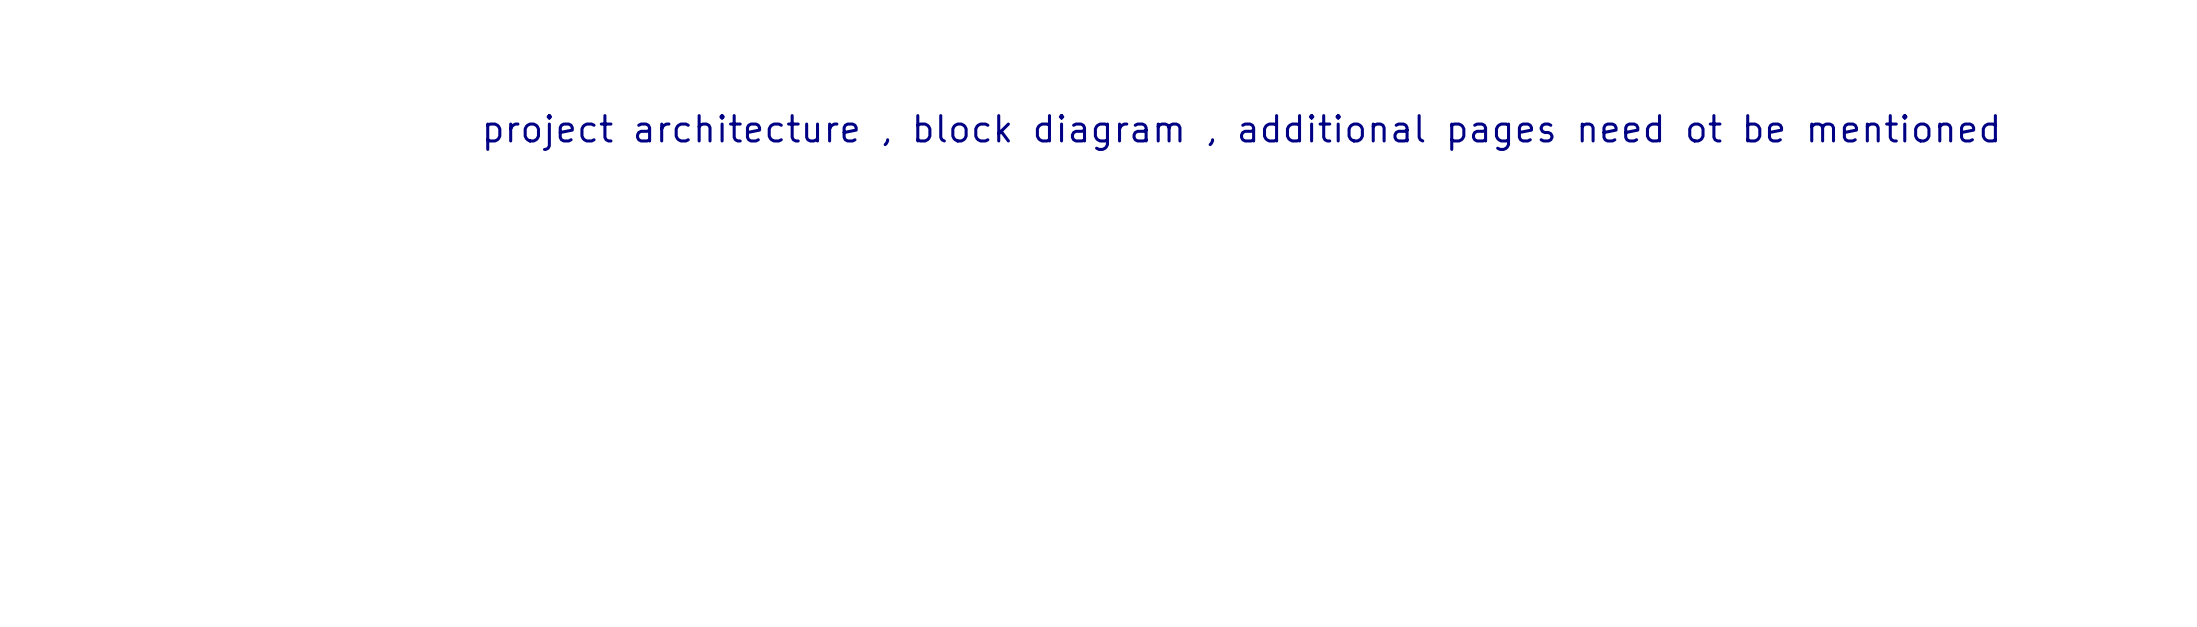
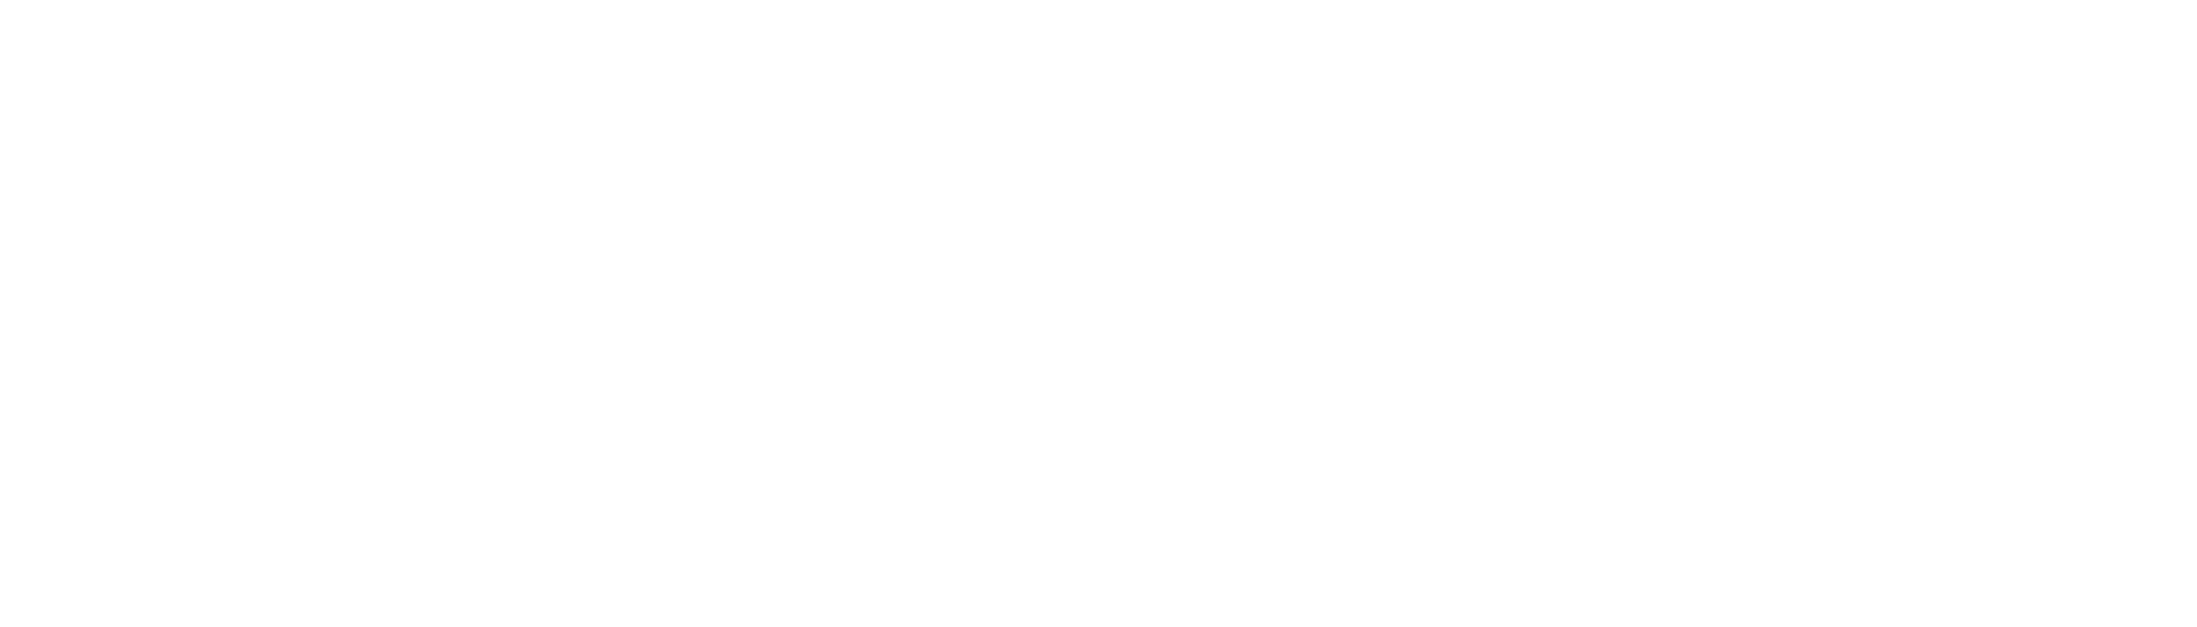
text: project architecture , block diagram , additional pages need ot be mentioned (1241, 132) -> none

